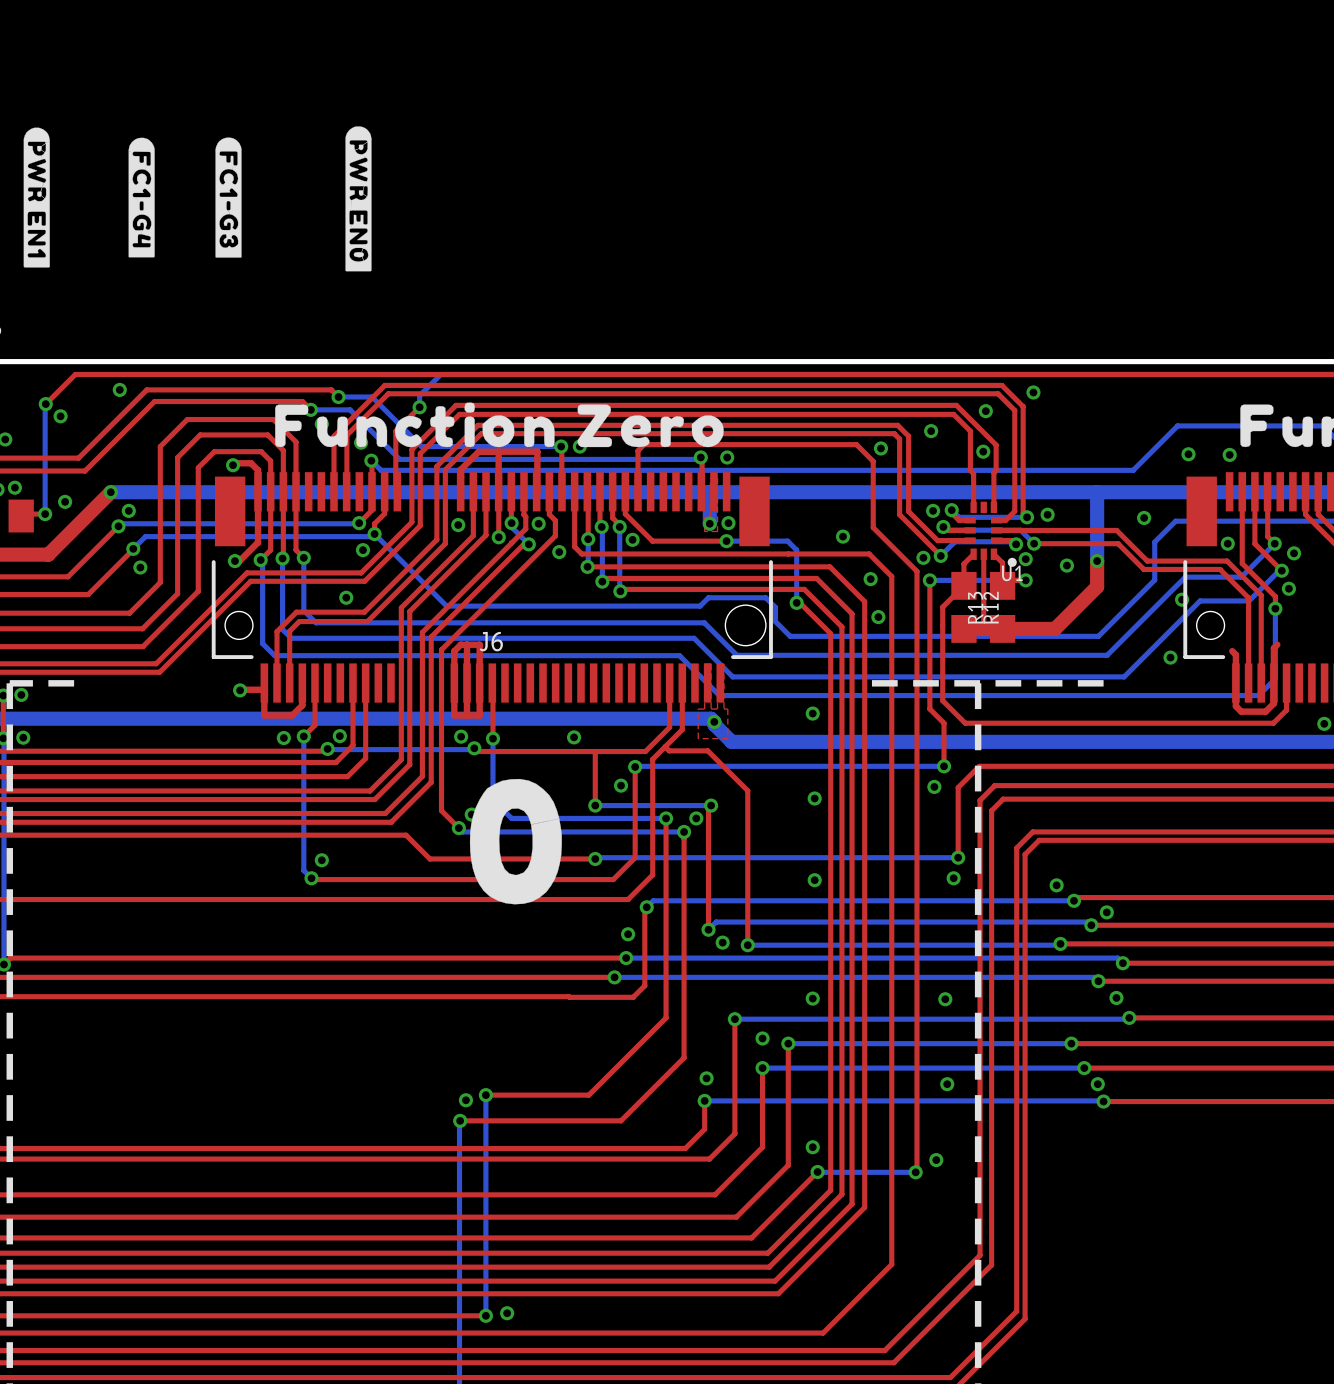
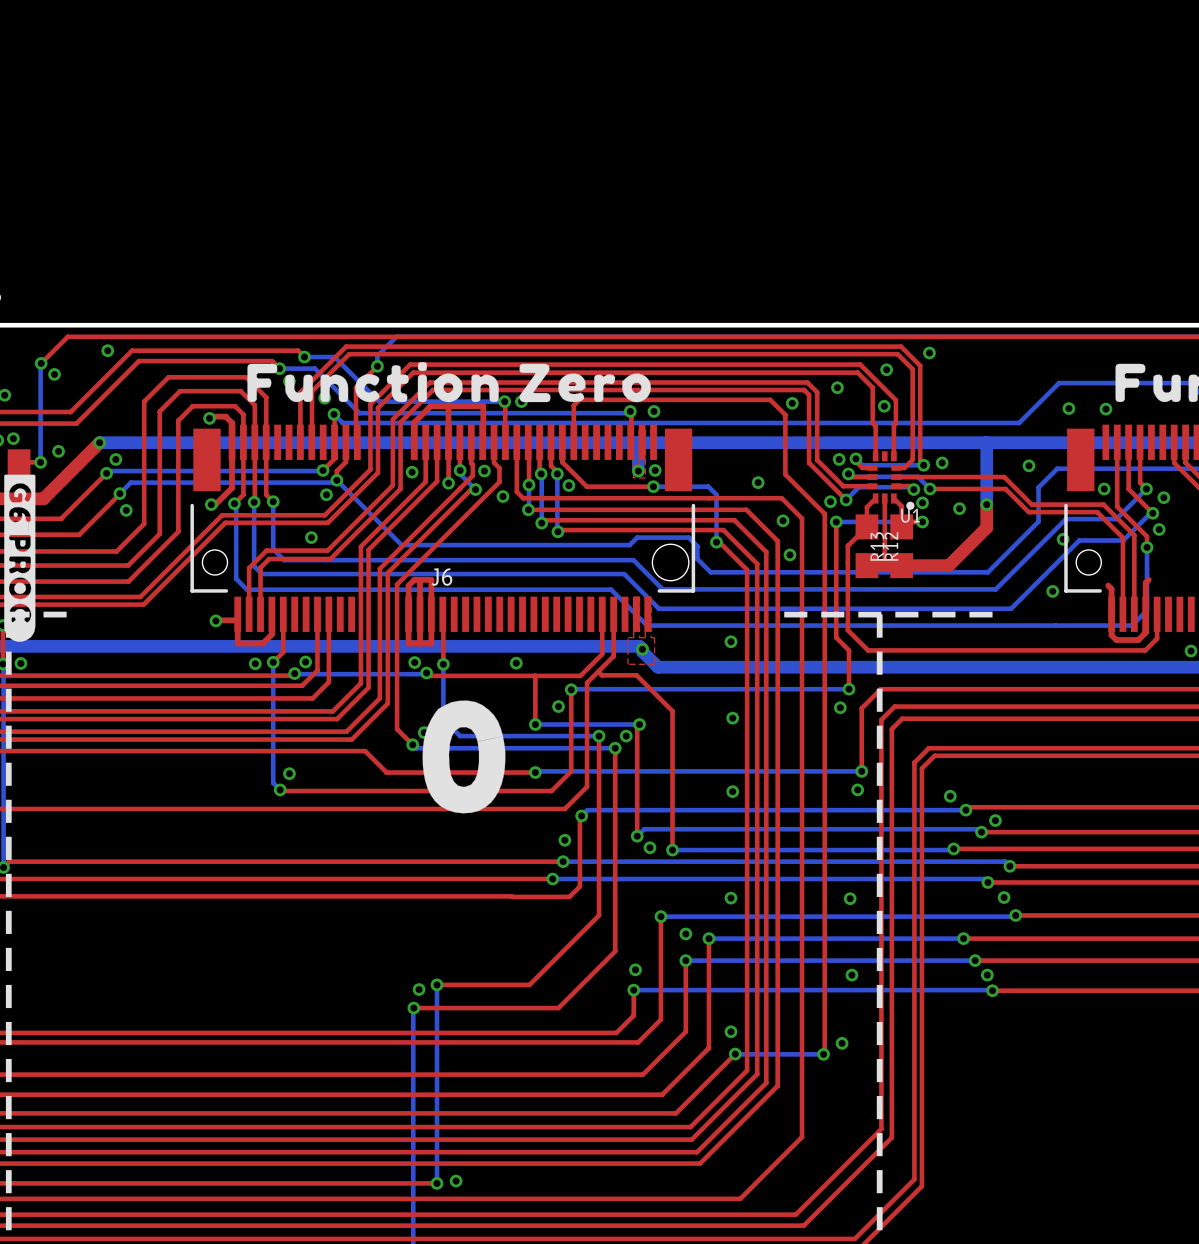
drawing: [345, 126, 372, 272] -> none
drawing: [23, 127, 50, 268] -> none
drawing: [128, 137, 155, 258] -> none
drawing: [215, 137, 242, 258] -> none
drawing: none -> [4, 474, 36, 642]

